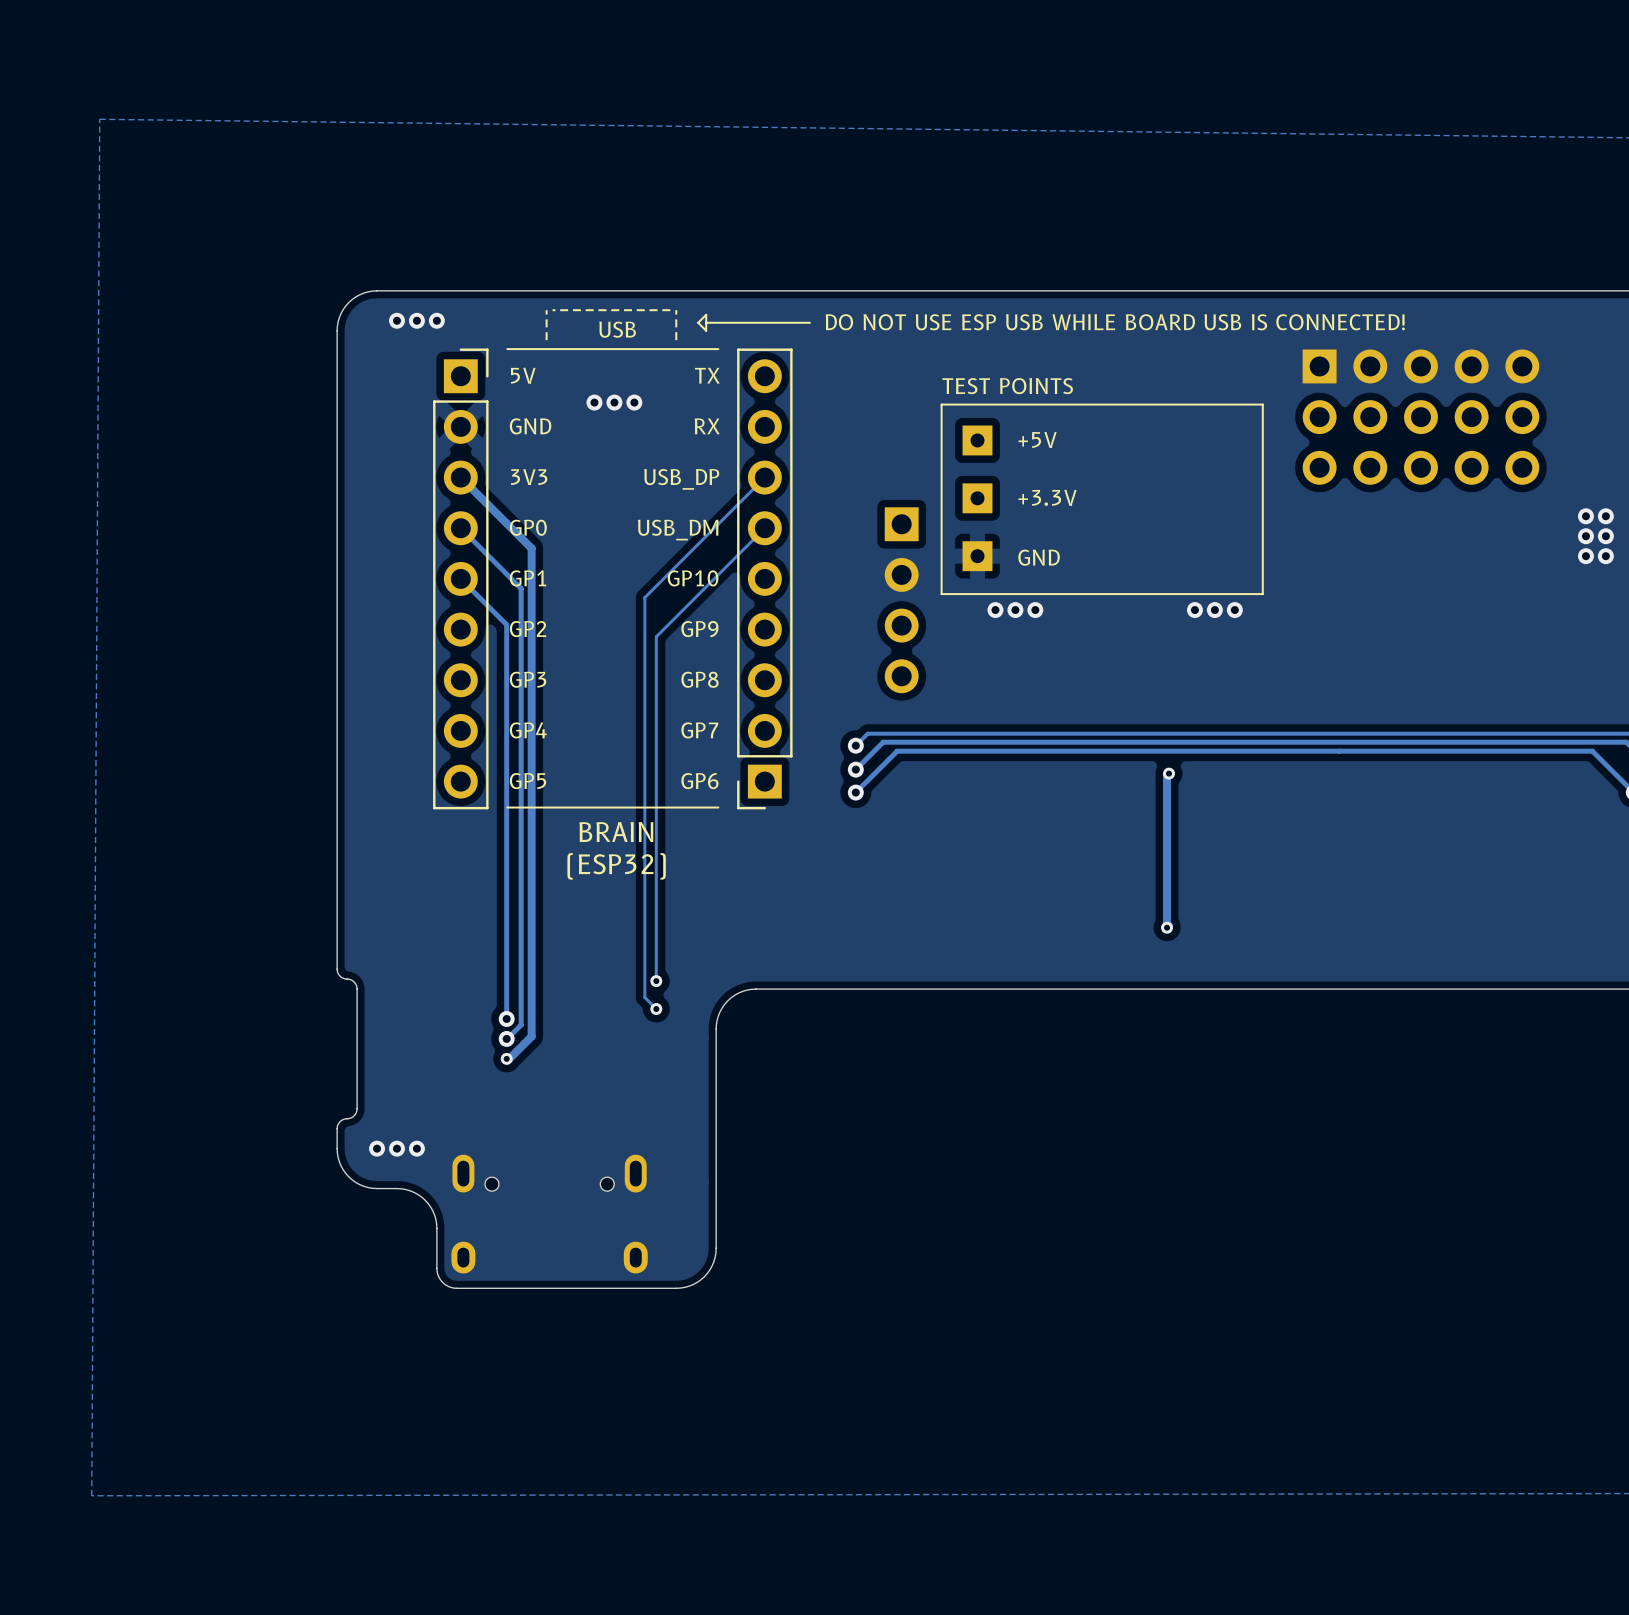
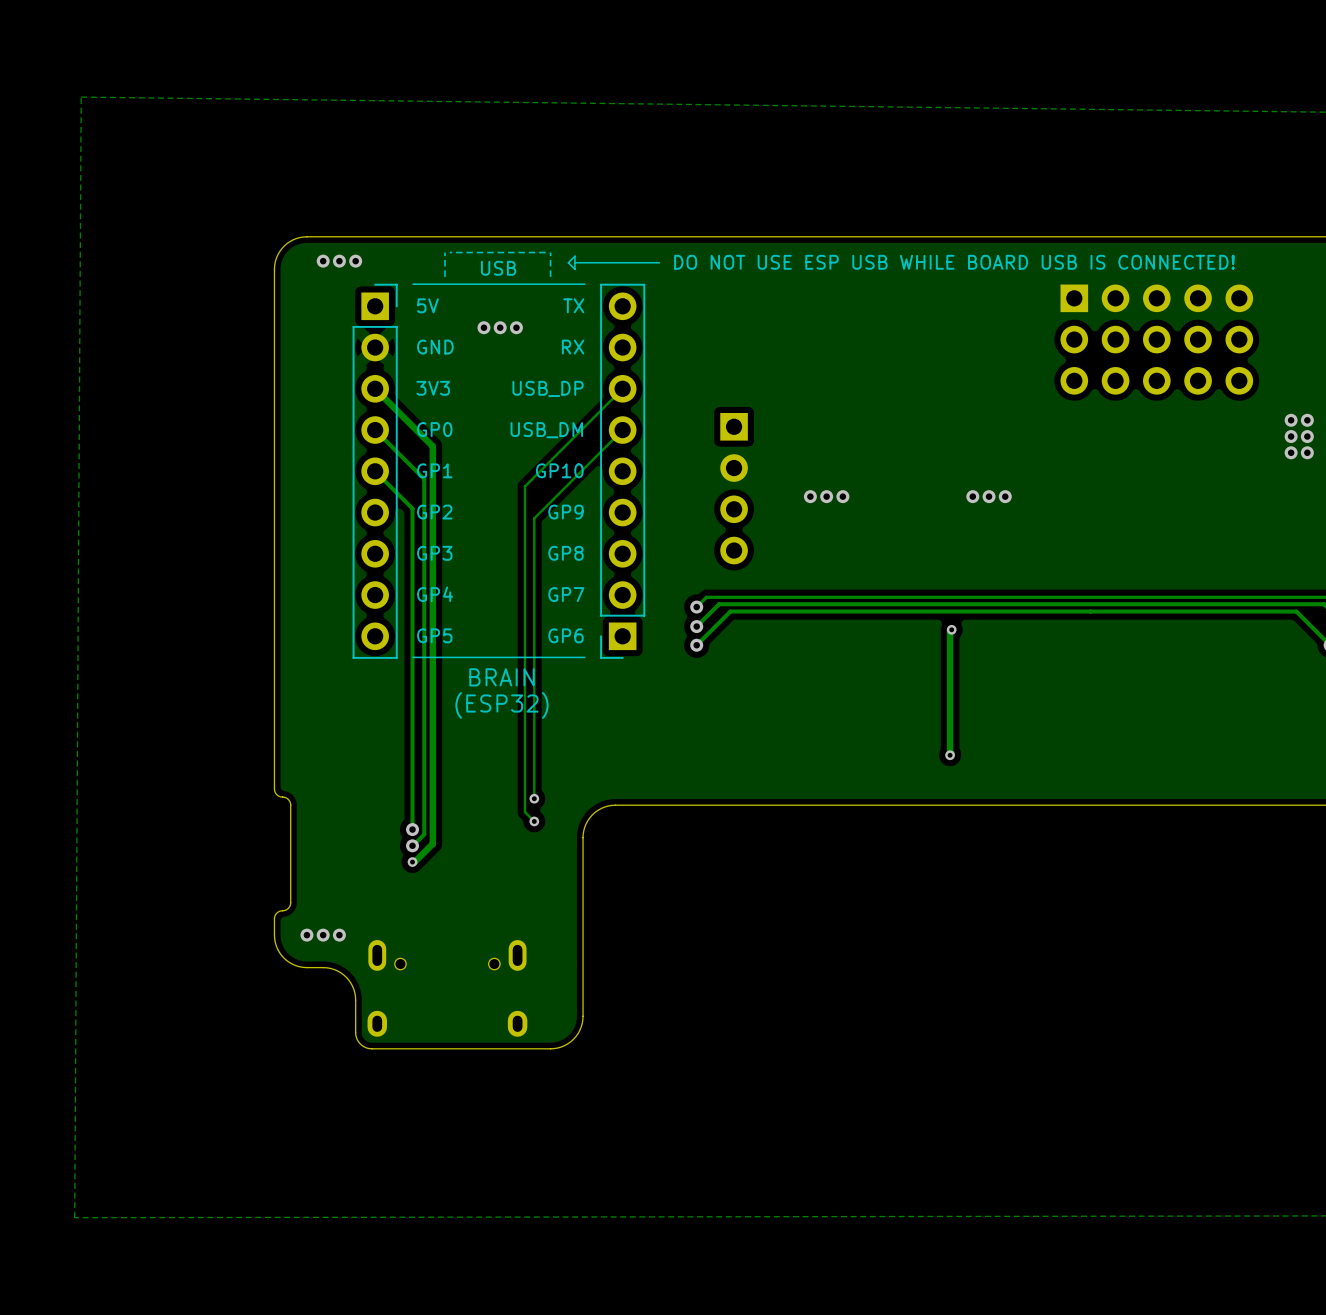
text: TEST POINTS (1007, 386) -> none
line: (1262, 404) (941, 404) (941, 594) (1262, 594) (1262, 404) -> none
text: +5V (1037, 439) -> none
part: (977, 440) -> none
text: +3.3V (1047, 497) -> none
part: (977, 498) -> none
part: (977, 556) -> none
text: GND (1039, 557) -> none

